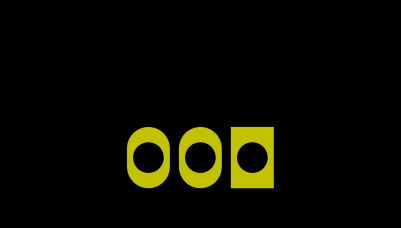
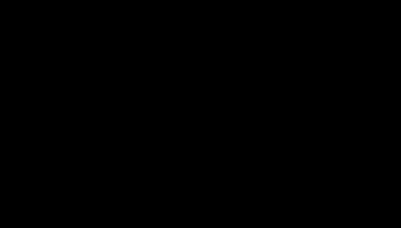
part: (200, 157) -> none

